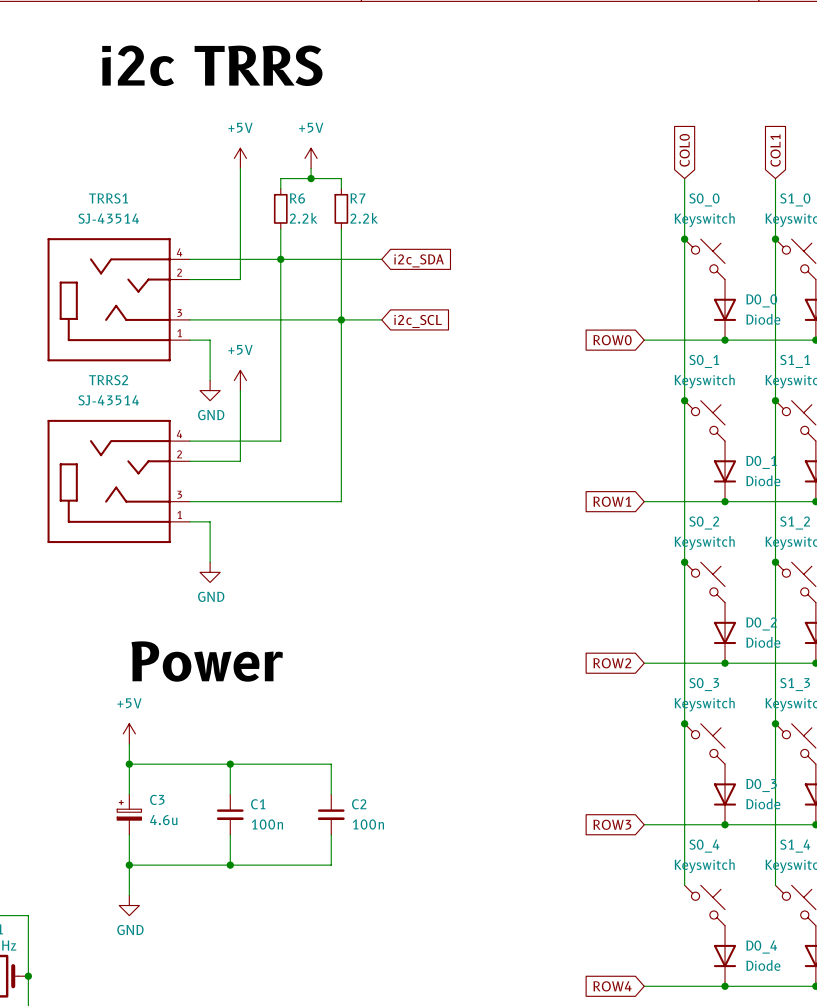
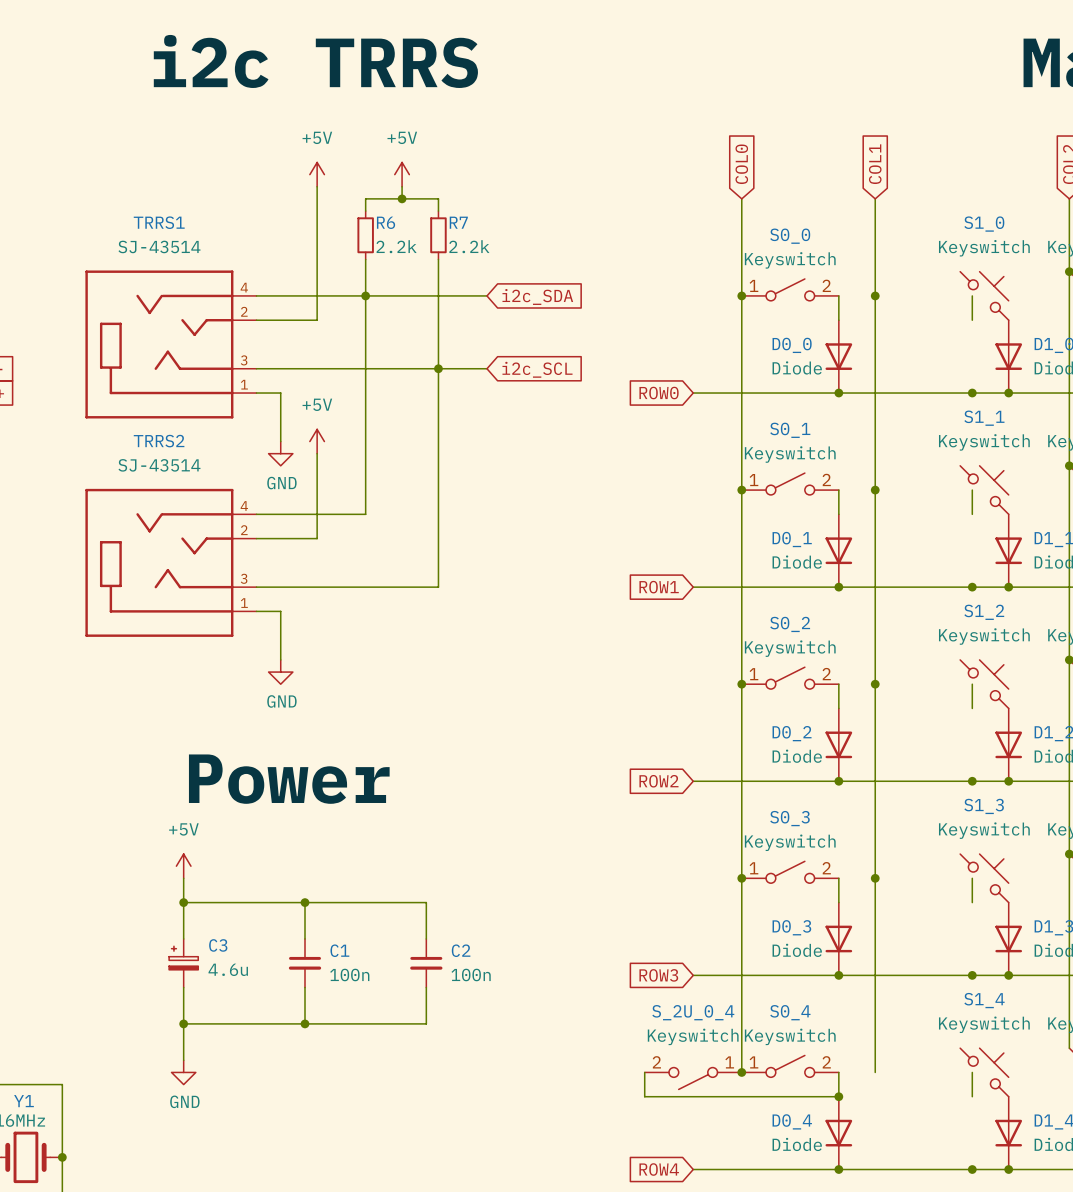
global label position: COL0 (684, 150) -> COL0 (741, 164)
global label position: COL1 (775, 150) -> COL1 (875, 164)
wire: none -> (741, 198) (741, 1072)
wire: (684, 178) (684, 885) -> none
wire: none -> (875, 198) (875, 1072)
wire: (775, 178) (775, 885) -> none
junction position: (684, 239) -> (875, 295)
S0_0 symbol: [684, 239, 726, 280] -> [741, 278, 839, 301]
junction: (775, 239) -> none
junction: none -> (741, 295)
wire: none -> (838, 295) (838, 320)
wire: none -> (972, 295) (972, 320)
D0_0 name position: D0_0 (761, 300) -> D0_0 (792, 345)
D0_0 position: (725, 309) -> (838, 356)
D0_0 value position: Diode (763, 319) -> Diode (797, 367)
wire: none -> (693, 393) (802, 393)
global label position: ROW0 (612, 340) -> ROW0 (659, 393)
junction: none -> (838, 393)
junction: (725, 340) -> none
junction: none -> (972, 393)
junction position: (684, 400) -> (875, 490)
S0_1 symbol: [684, 400, 726, 442] -> [741, 473, 839, 495]
junction: (775, 400) -> none
junction: none -> (741, 490)
wire: none -> (838, 490) (838, 514)
wire: none -> (972, 490) (972, 514)
D0_1 name position: D0_1 (761, 462) -> D0_1 (792, 539)
D0_1 position: (725, 471) -> (838, 550)
D0_1 value position: Diode (763, 480) -> Diode (797, 562)
wire: none -> (693, 587) (802, 587)
global label position: ROW1 (612, 501) -> ROW1 (659, 587)
junction: none -> (838, 587)
junction: (725, 501) -> none
junction: none -> (972, 587)
junction position: (684, 562) -> (875, 684)
S0_2 symbol: [684, 562, 726, 603] -> [741, 667, 839, 690]
junction: (775, 562) -> none
junction: none -> (741, 684)
wire: none -> (838, 684) (838, 708)
wire: none -> (972, 684) (972, 708)
D0_2 name position: D0_2 (761, 623) -> D0_2 (792, 733)
D0_2 position: (725, 632) -> (838, 744)
D0_2 value position: Diode (763, 642) -> Diode (797, 756)
wire: none -> (693, 781) (802, 781)
global label position: ROW2 (612, 663) -> ROW2 (658, 781)
junction: none -> (838, 781)
junction: (725, 663) -> none
junction: none -> (972, 781)
junction position: (684, 723) -> (875, 878)
S0_3 symbol: [684, 723, 726, 765] -> [741, 861, 839, 884]
junction: (775, 723) -> none
junction: none -> (741, 878)
wire: none -> (838, 878) (838, 902)
wire: none -> (972, 878) (972, 902)
D0_3 name position: D0_3 (761, 785) -> D0_3 (791, 927)
D0_3 position: (725, 794) -> (838, 938)
D0_3 value position: Diode (763, 803) -> Diode (797, 950)
wire: none -> (693, 975) (802, 975)
global label position: ROW3 (612, 824) -> ROW3 (658, 975)
junction: none -> (838, 975)
junction: (725, 824) -> none
junction: none -> (972, 975)
S0_4 symbol: [684, 885, 726, 926] -> [741, 1055, 839, 1078]
wire: none -> (644, 1072) (644, 1096) (838, 1096) (838, 1072)
junction: none -> (741, 1072)
wire: none -> (972, 1072) (972, 1096)
S_2U_0_4: none -> Keyswitch (693, 1078)
junction: none -> (838, 1096)
D0_4 name position: D0_4 (761, 947) -> D0_4 (792, 1121)
D0_4 position: (725, 956) -> (838, 1133)
D0_4 value position: Diode (763, 965) -> Diode (797, 1144)
wire: none -> (693, 1169) (802, 1169)
global label position: ROW4 (612, 986) -> ROW4 (659, 1169)
junction: none -> (838, 1169)
junction: (725, 986) -> none
junction: none -> (972, 1169)

